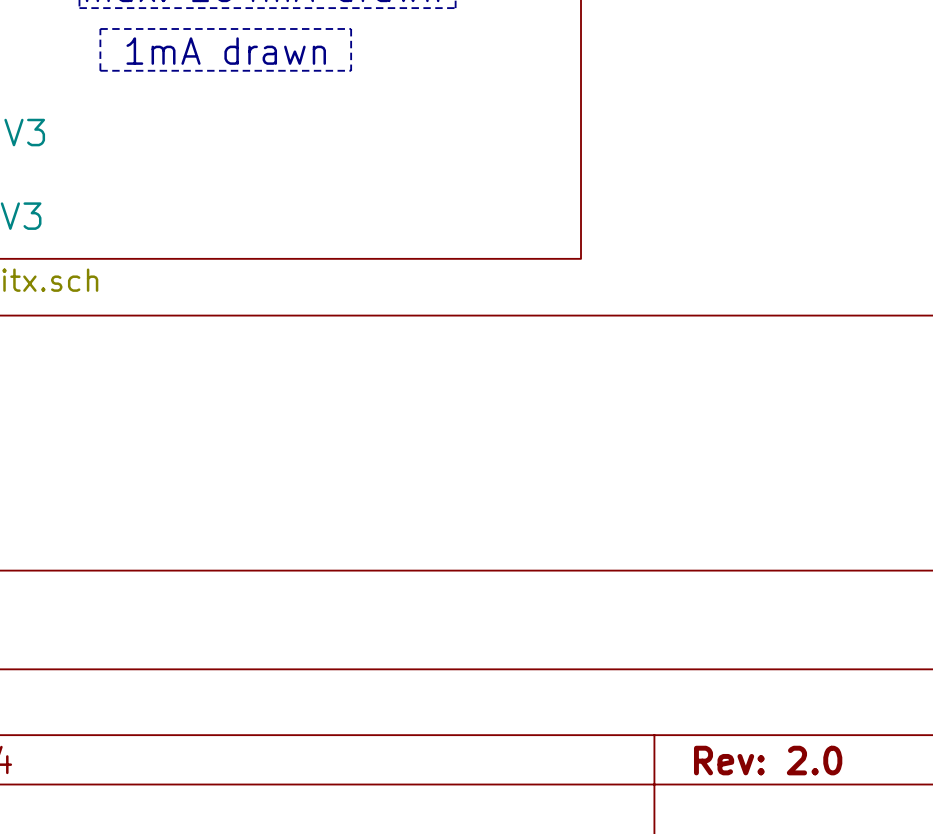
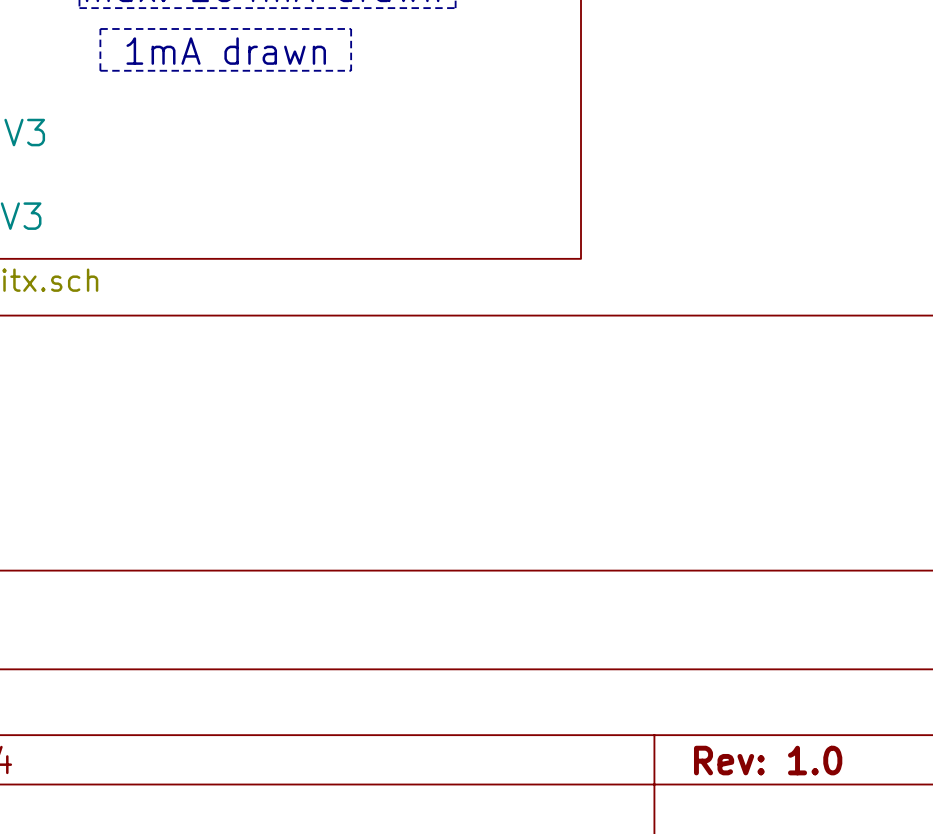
title block: Rev: 2.0 (768, 760) -> Rev: 1.0 (768, 760)

